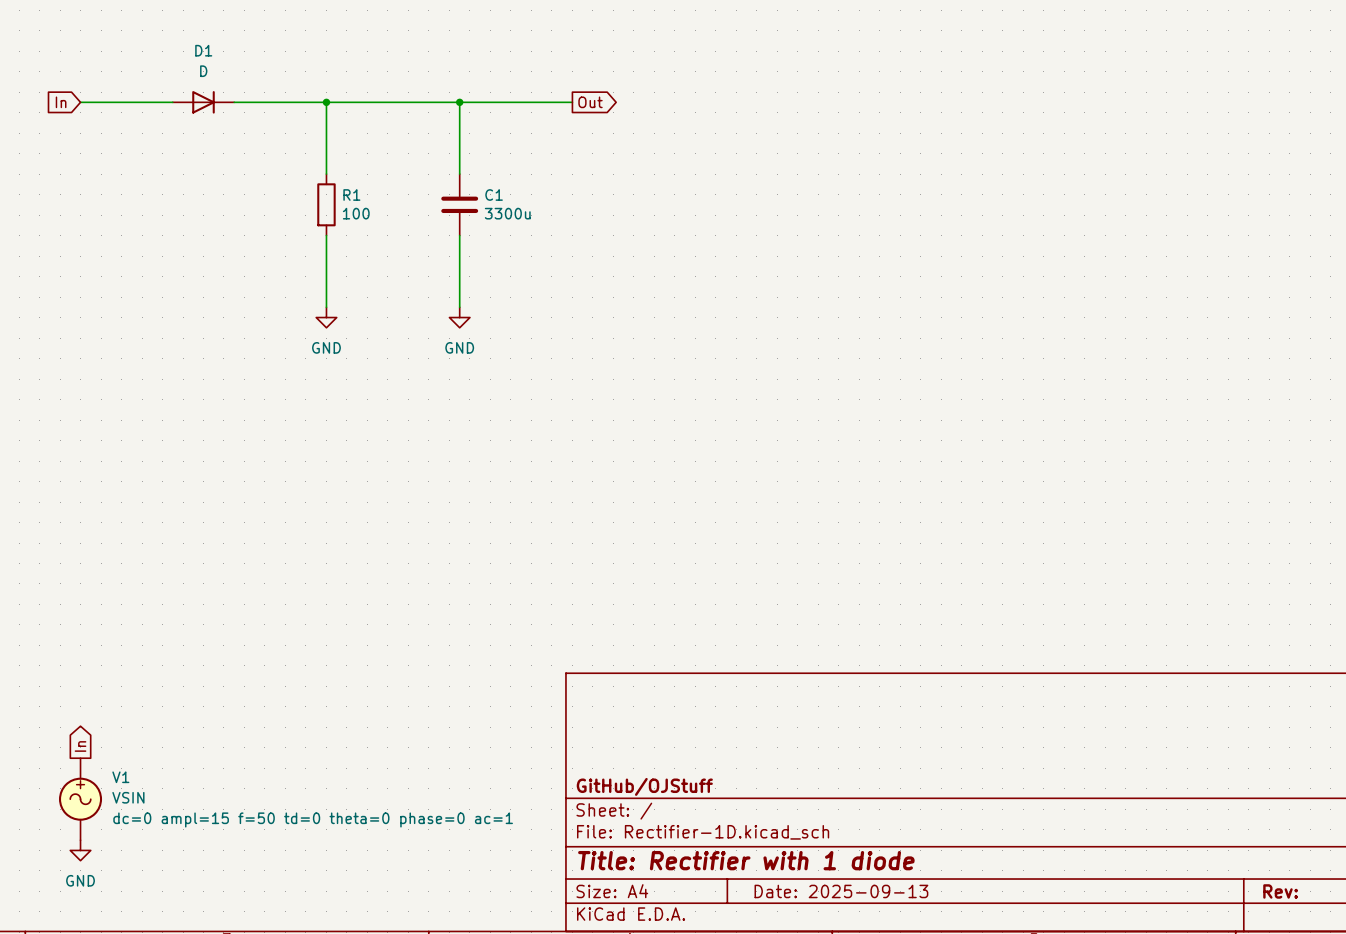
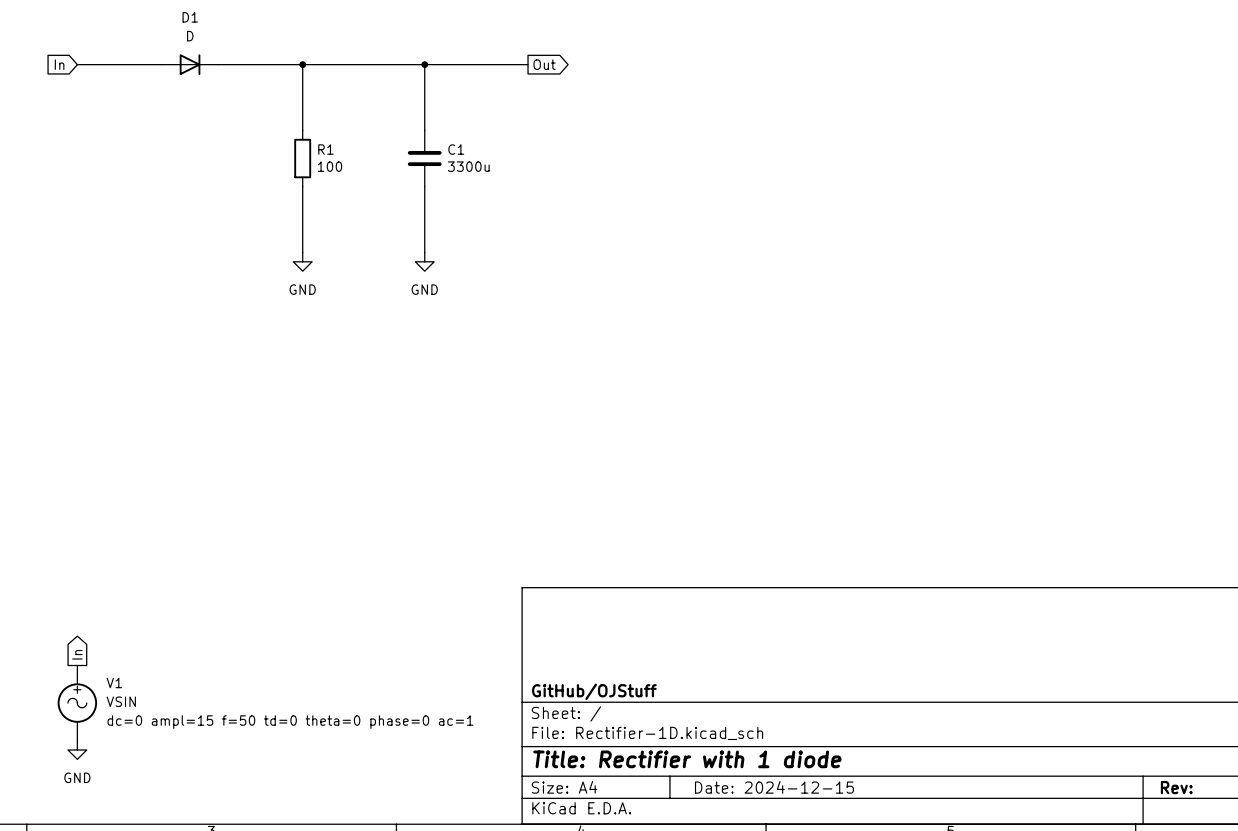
title block: Date: 2025-09-13 (841, 891) -> Date: 2024-12-15 (774, 787)

